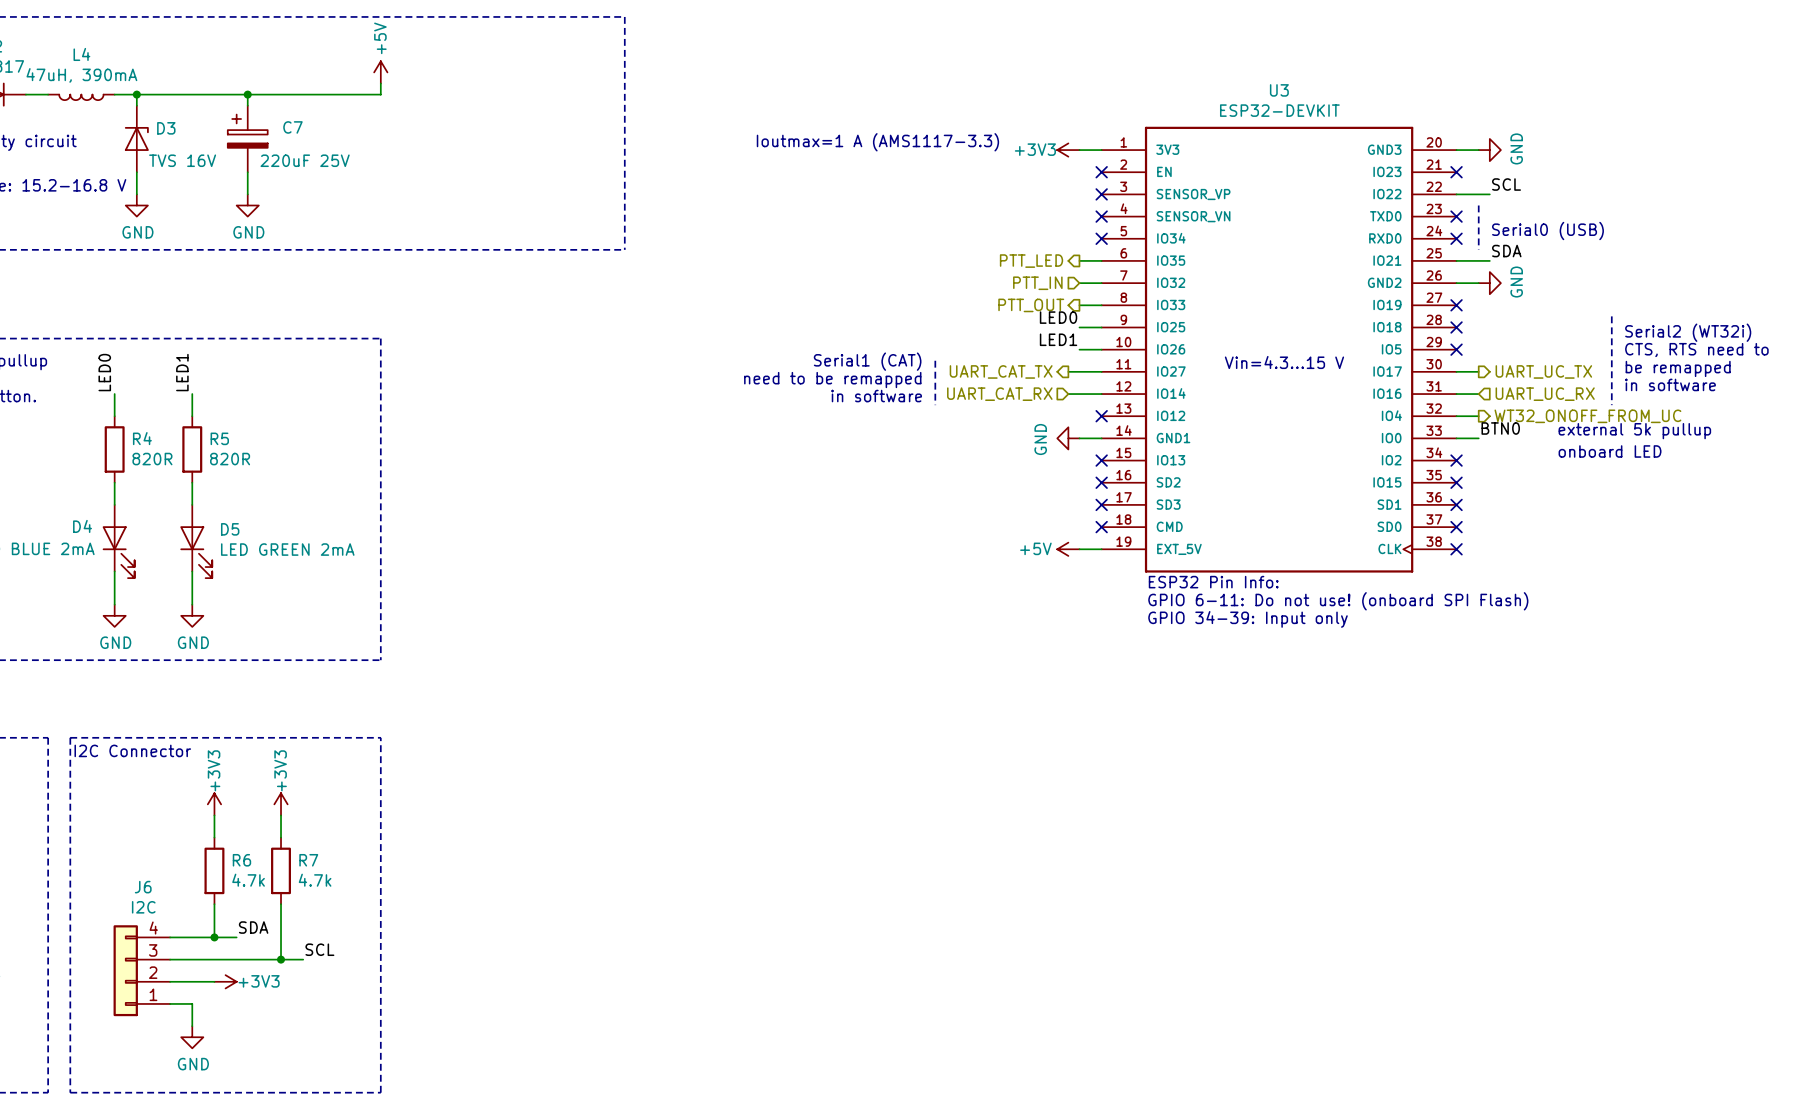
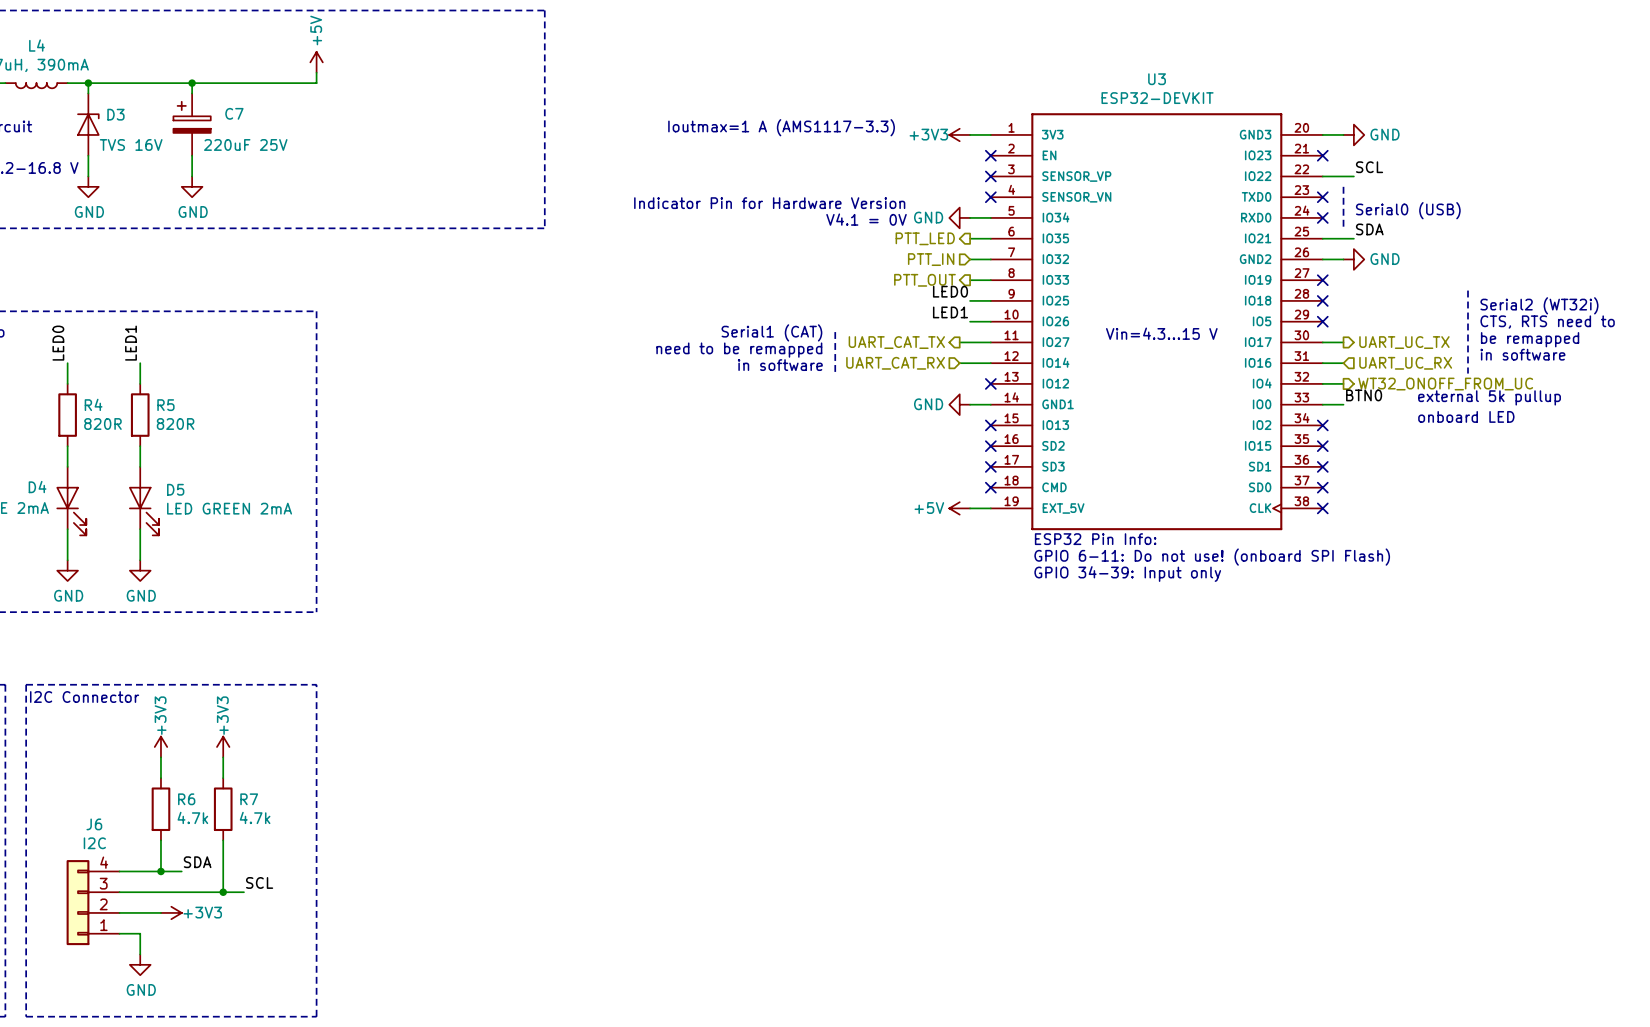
power symbol text rotation: 0° (1516, 148) -> 90° clockwise (1385, 134)
text: none -> Indicator Pin for Hardware Version (769, 203)
power symbol: none -> GND (959, 217)
wire: none -> (970, 217) (990, 217)
no-connect mark: (1101, 238) -> none
text: none -> V4.1 = 0V (866, 219)
power symbol text rotation: 0° (1516, 282) -> 90° clockwise (1385, 259)
power symbol text rotation: 0° (1040, 439) -> 90° clockwise (928, 404)

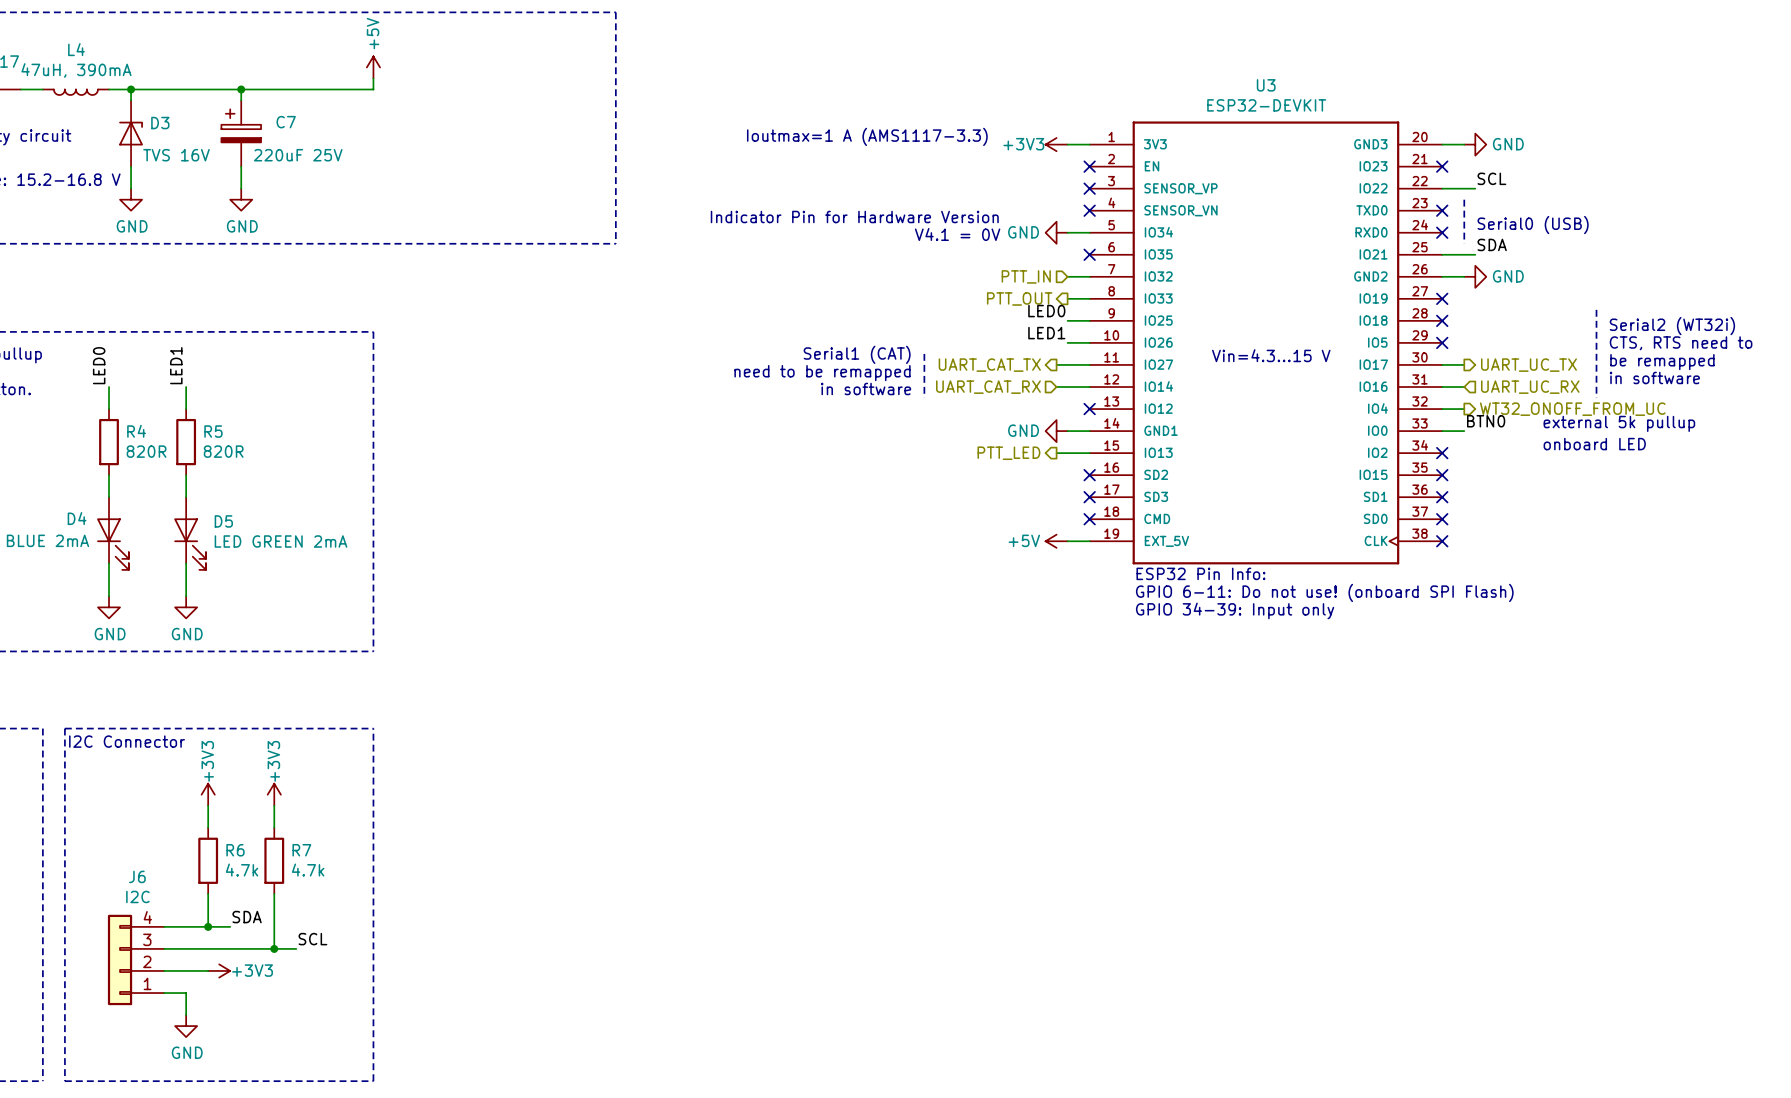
hierarchical label position: PTT_LED (925, 238) -> PTT_LED (1008, 453)
wire: (970, 238) (990, 238) -> none
no-connect mark: none -> (1089, 254)
wire: none -> (1056, 453) (1089, 453)
no-connect mark: (990, 425) -> none

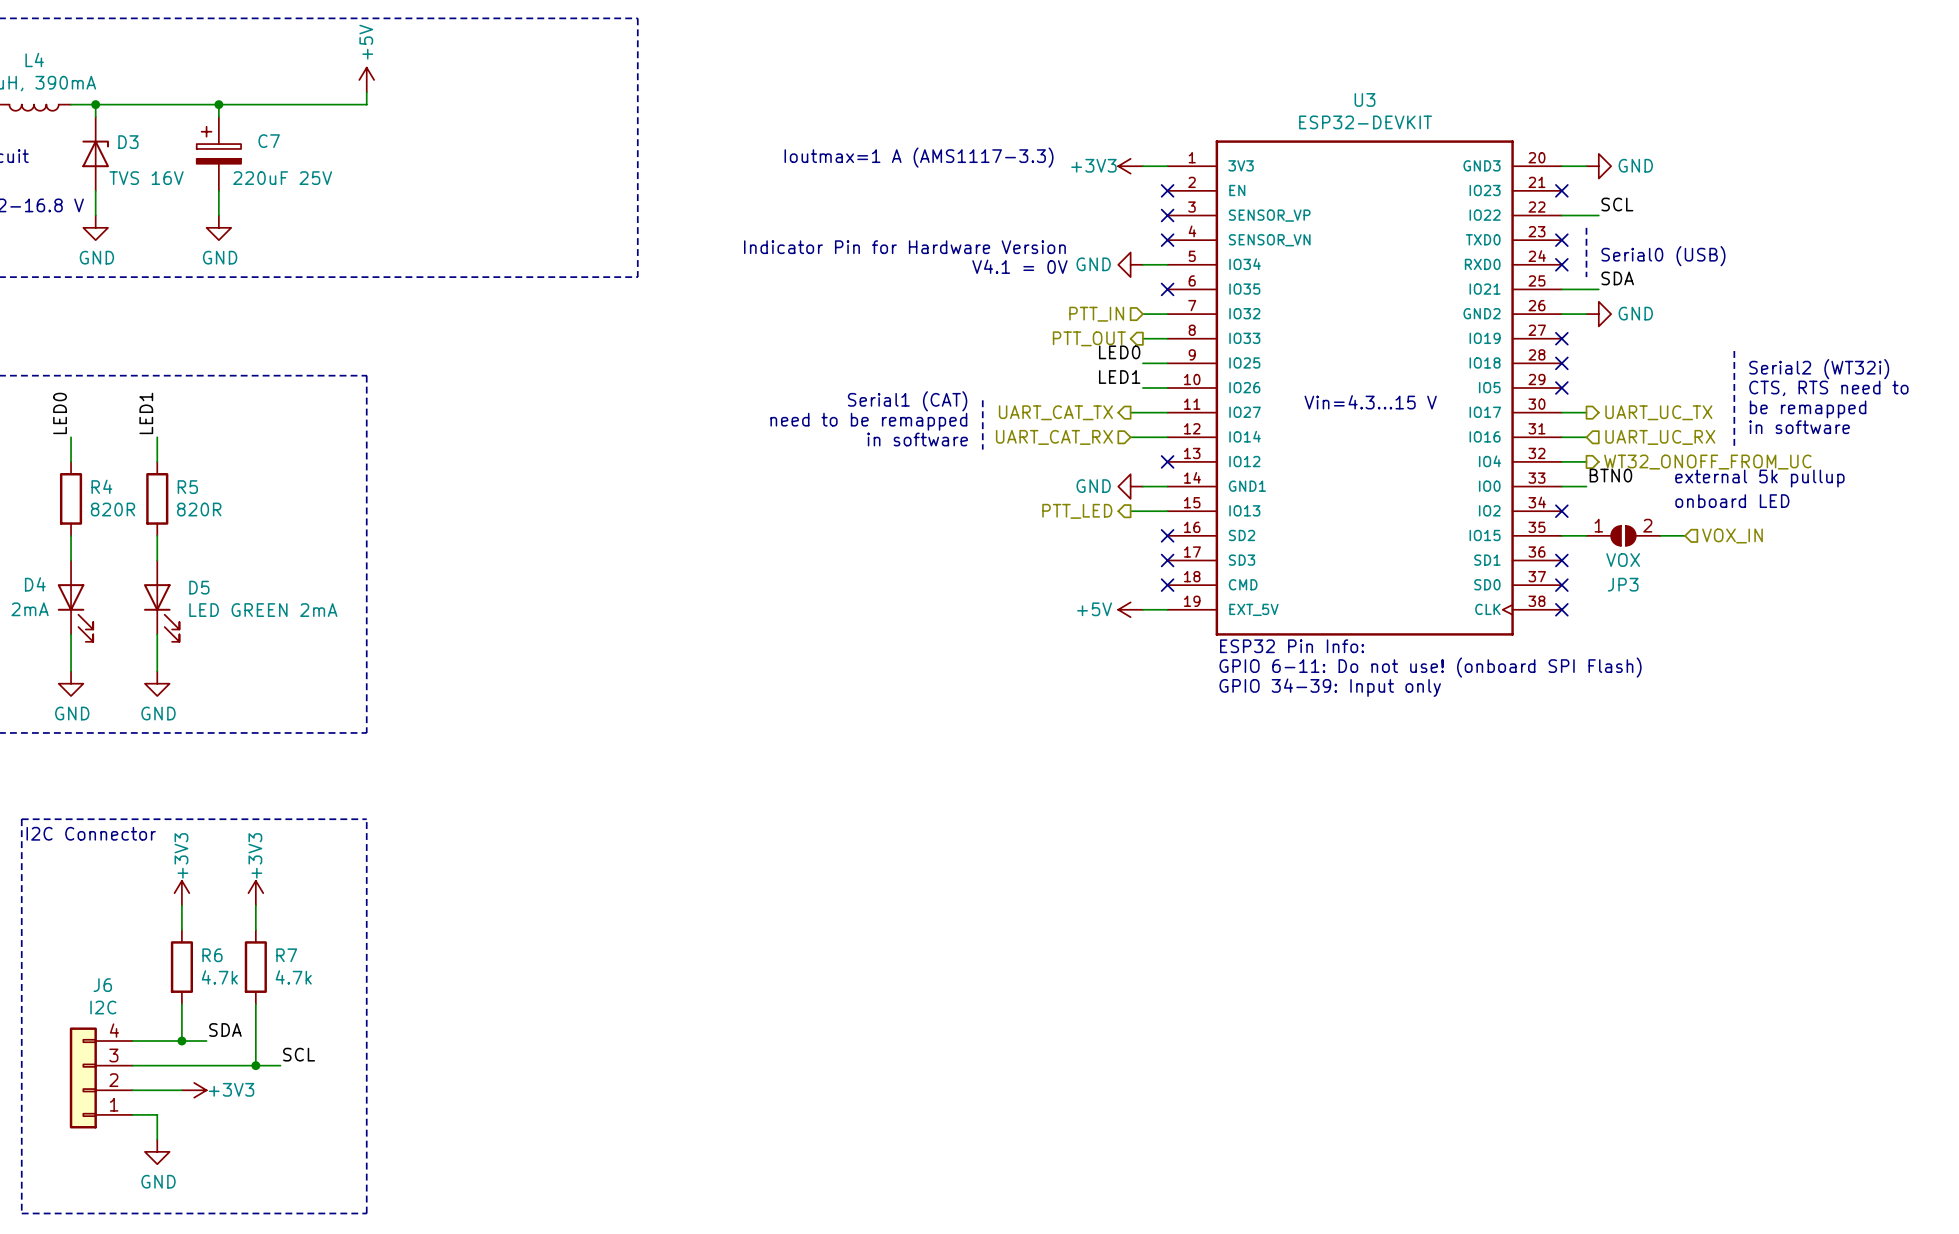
wire: none -> (1561, 535) (1586, 535)
no-connect mark: (1442, 475) -> none
JP3: none -> VOX (1623, 535)
wire: none -> (1660, 535) (1685, 535)
hierarchical label: none -> VOX_IN (1732, 535)

